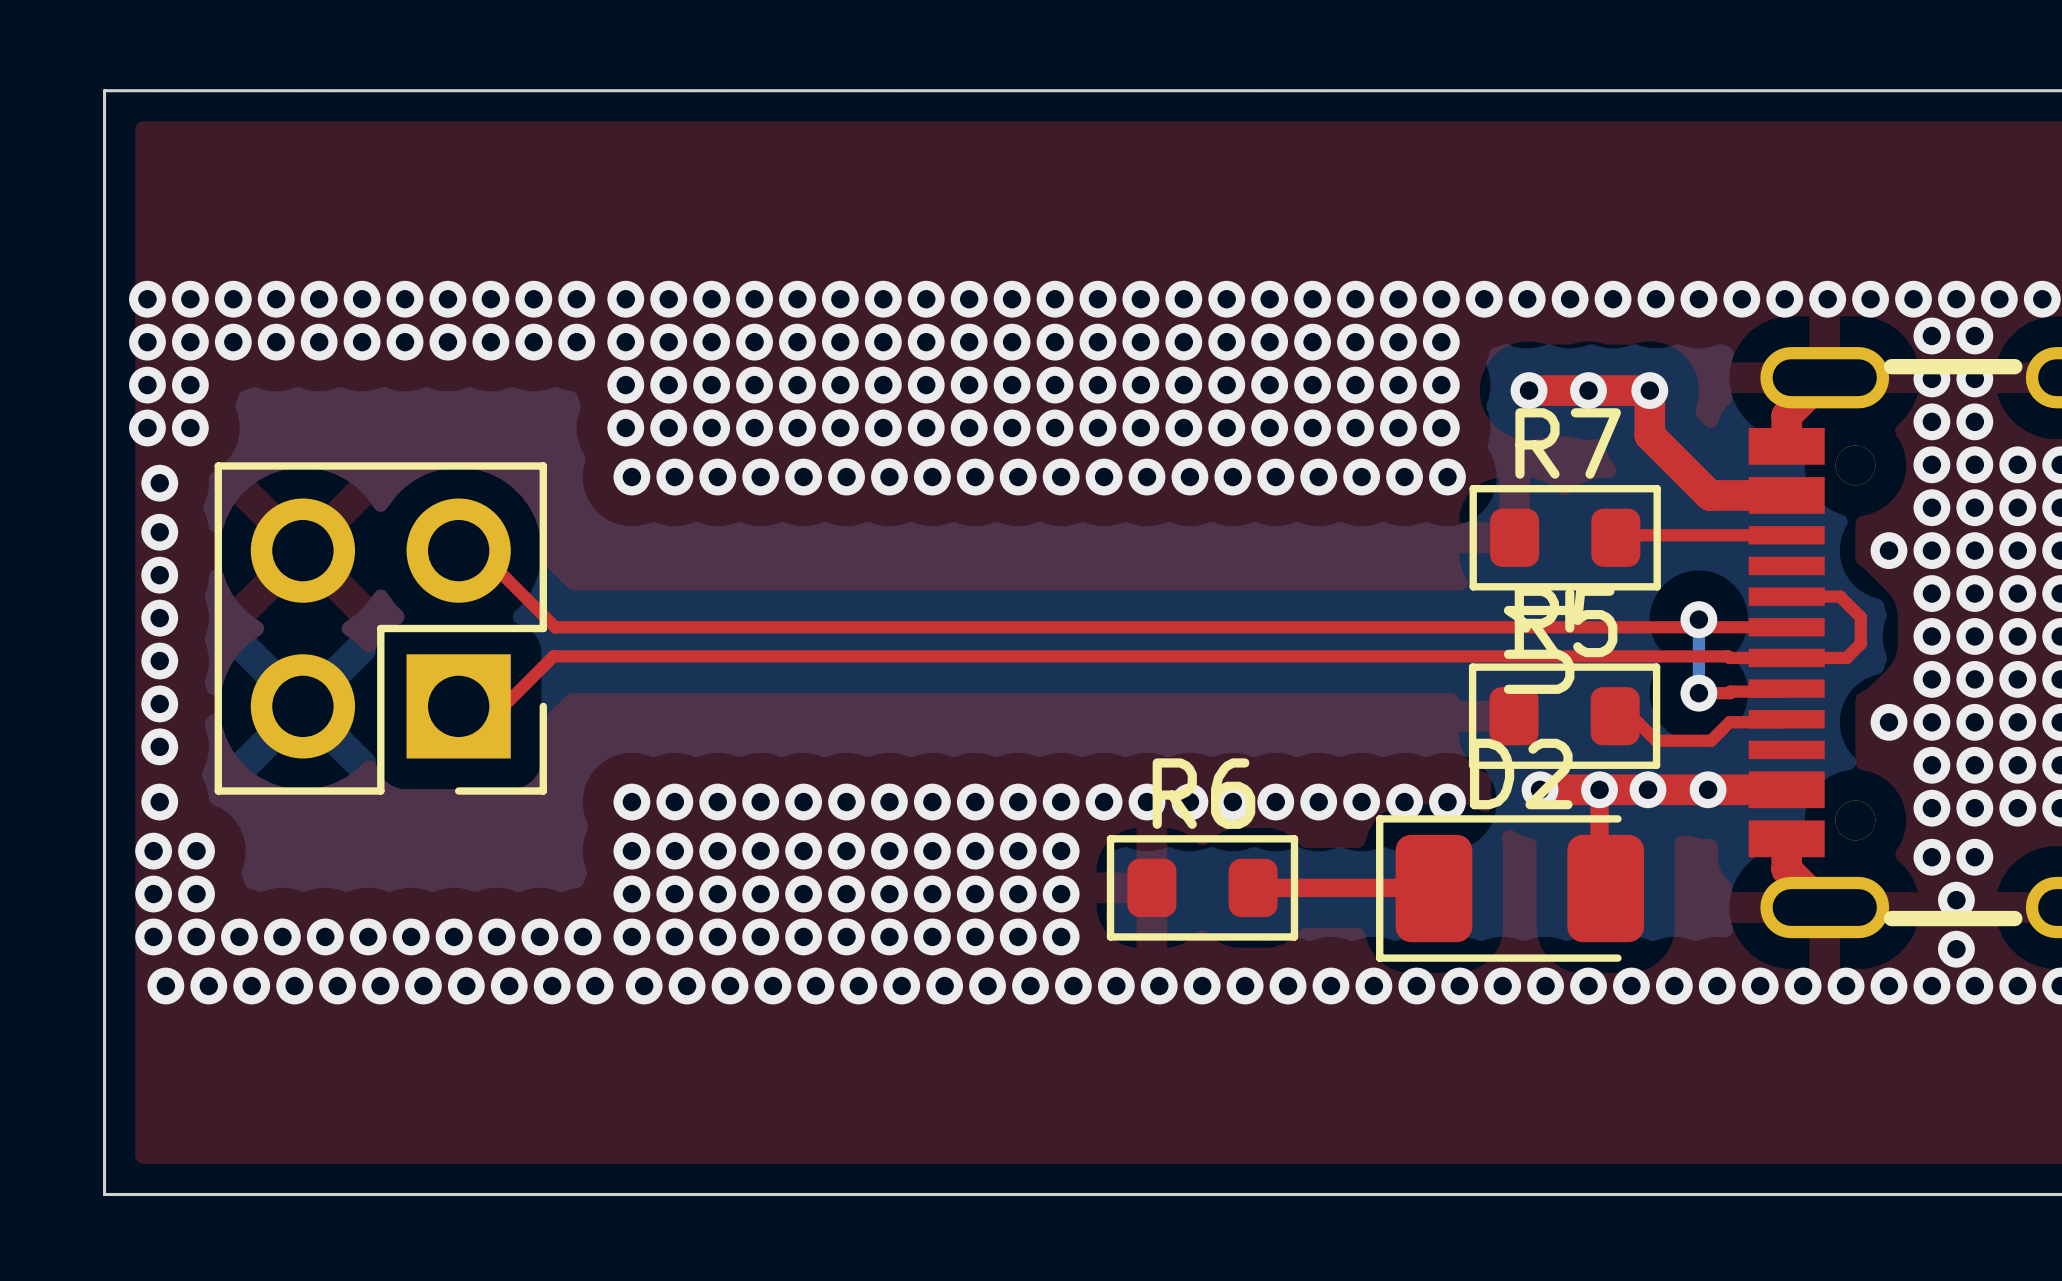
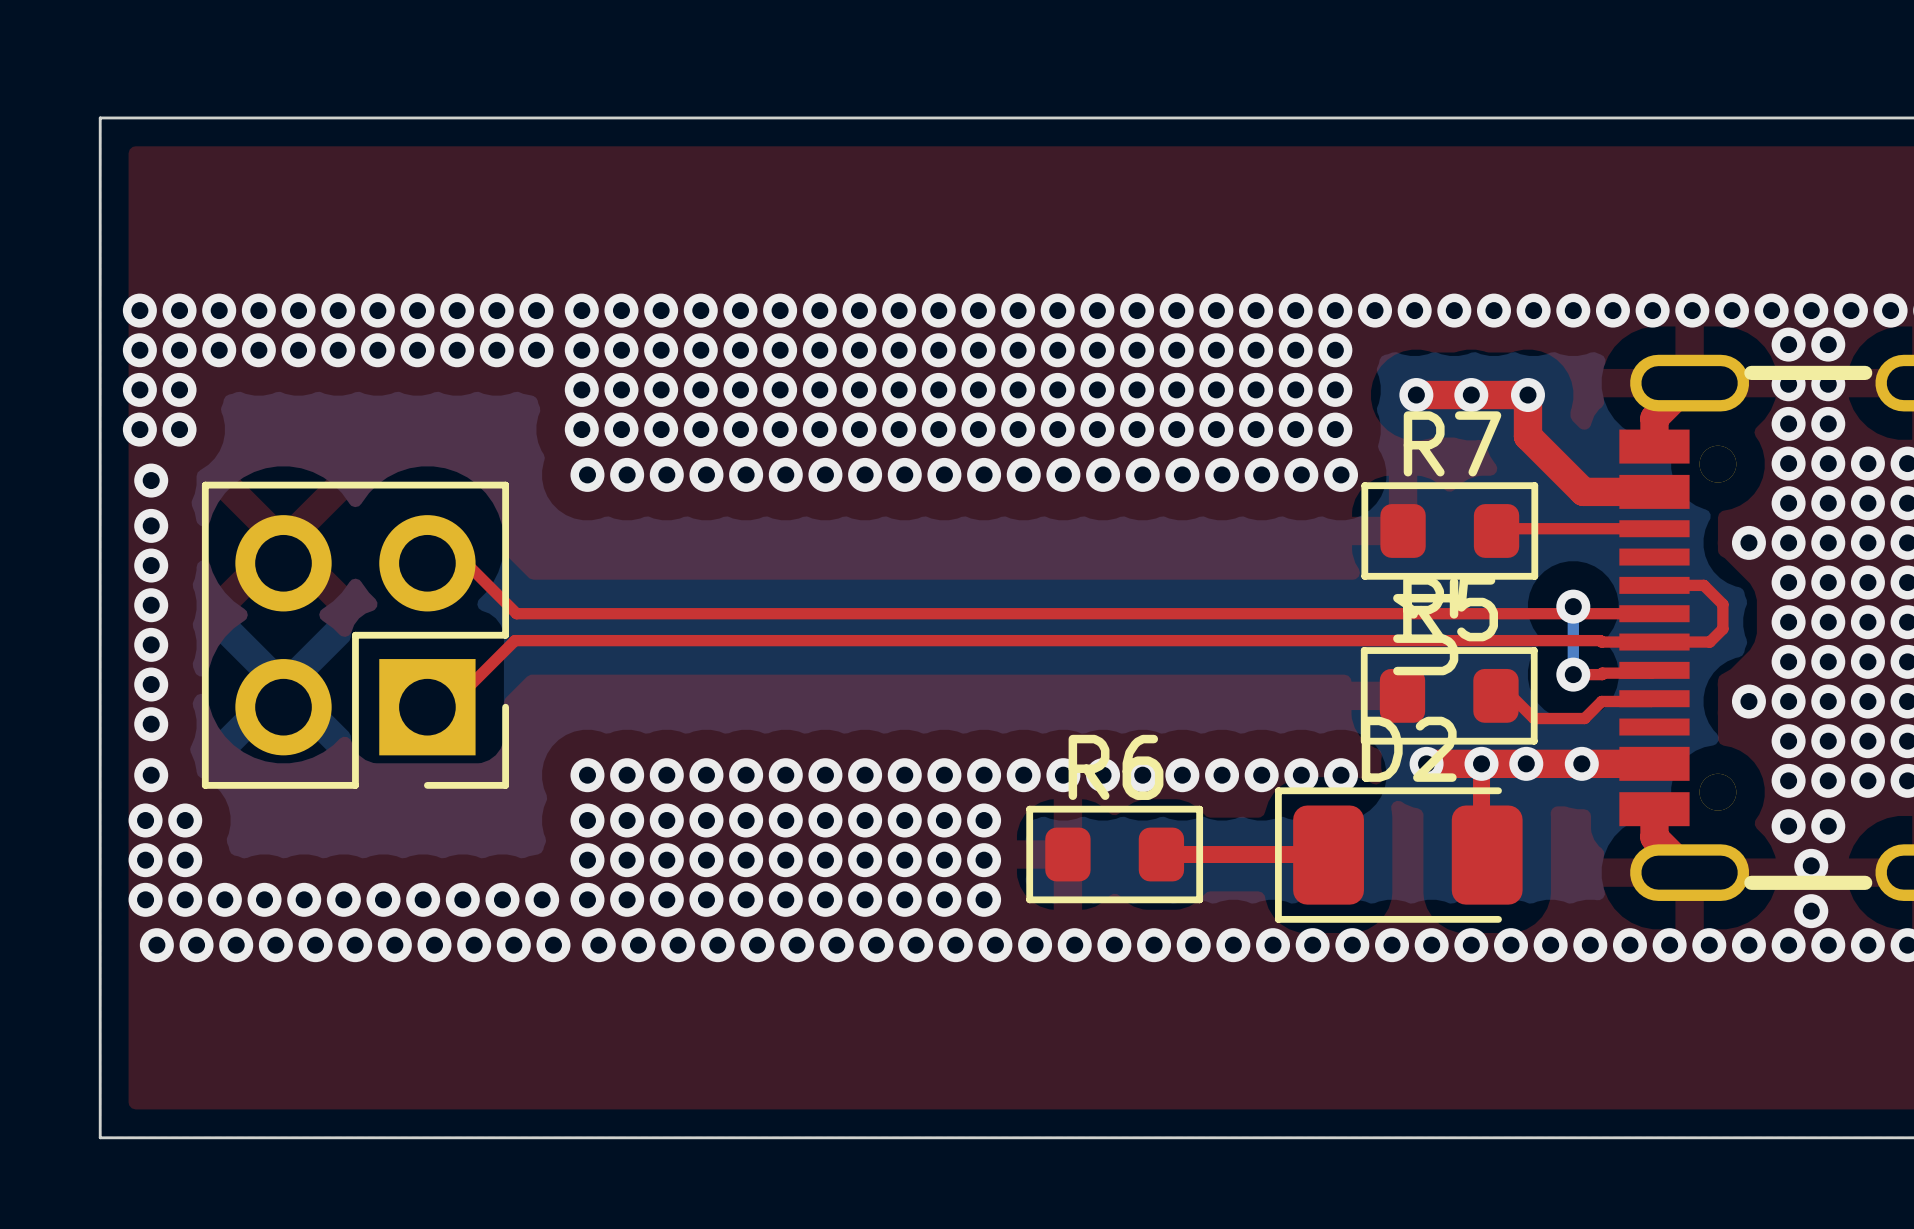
part position: (380, 628) -> (355, 635)

